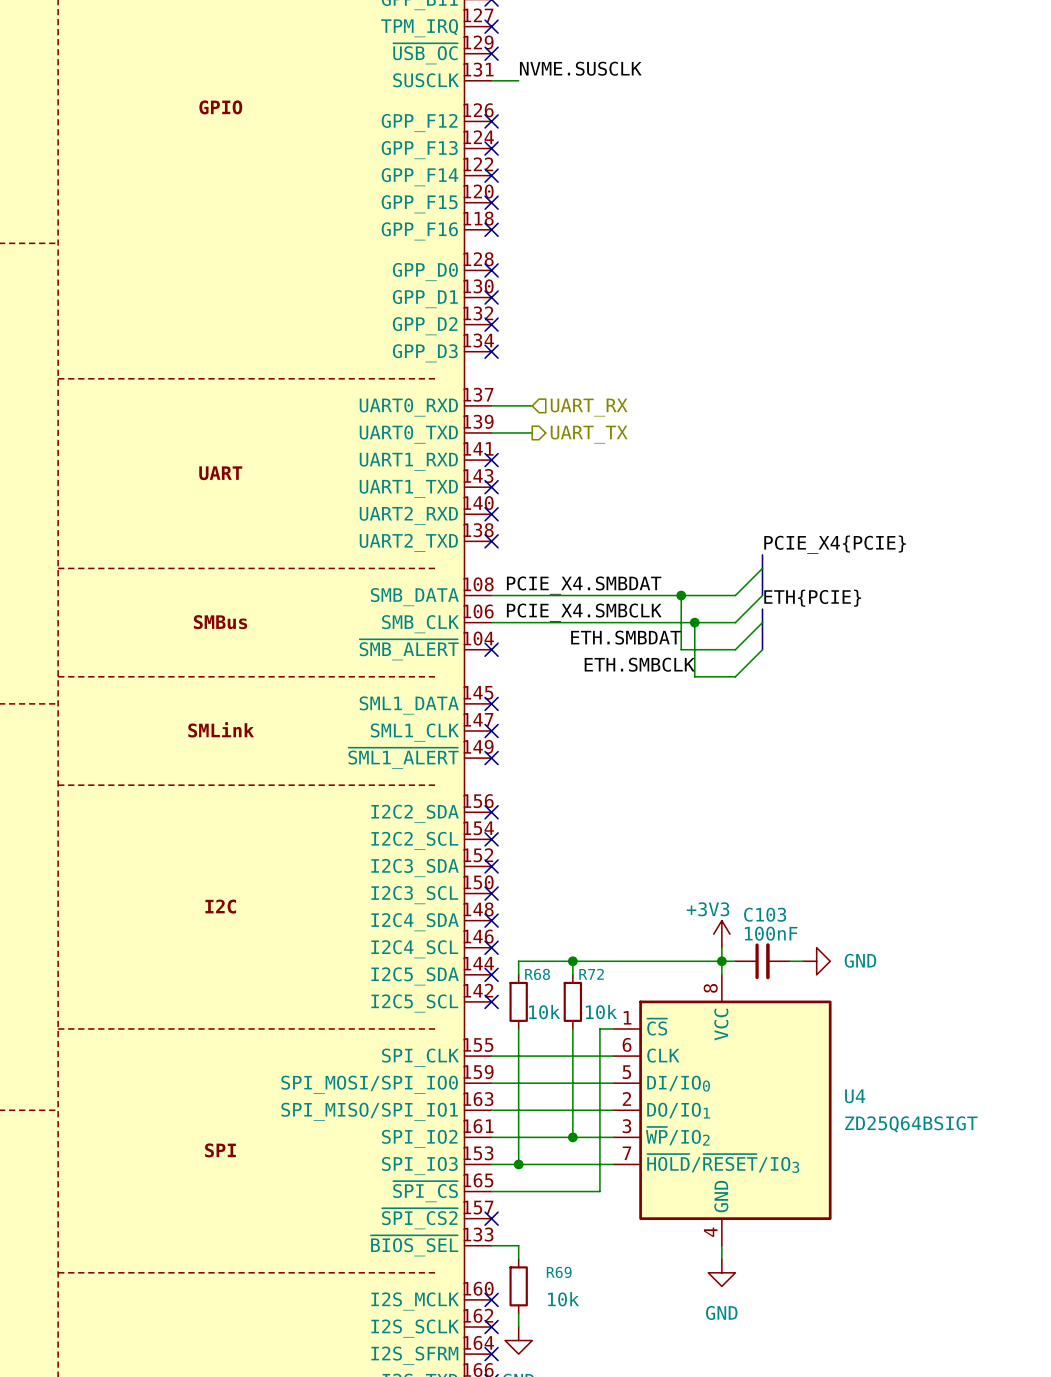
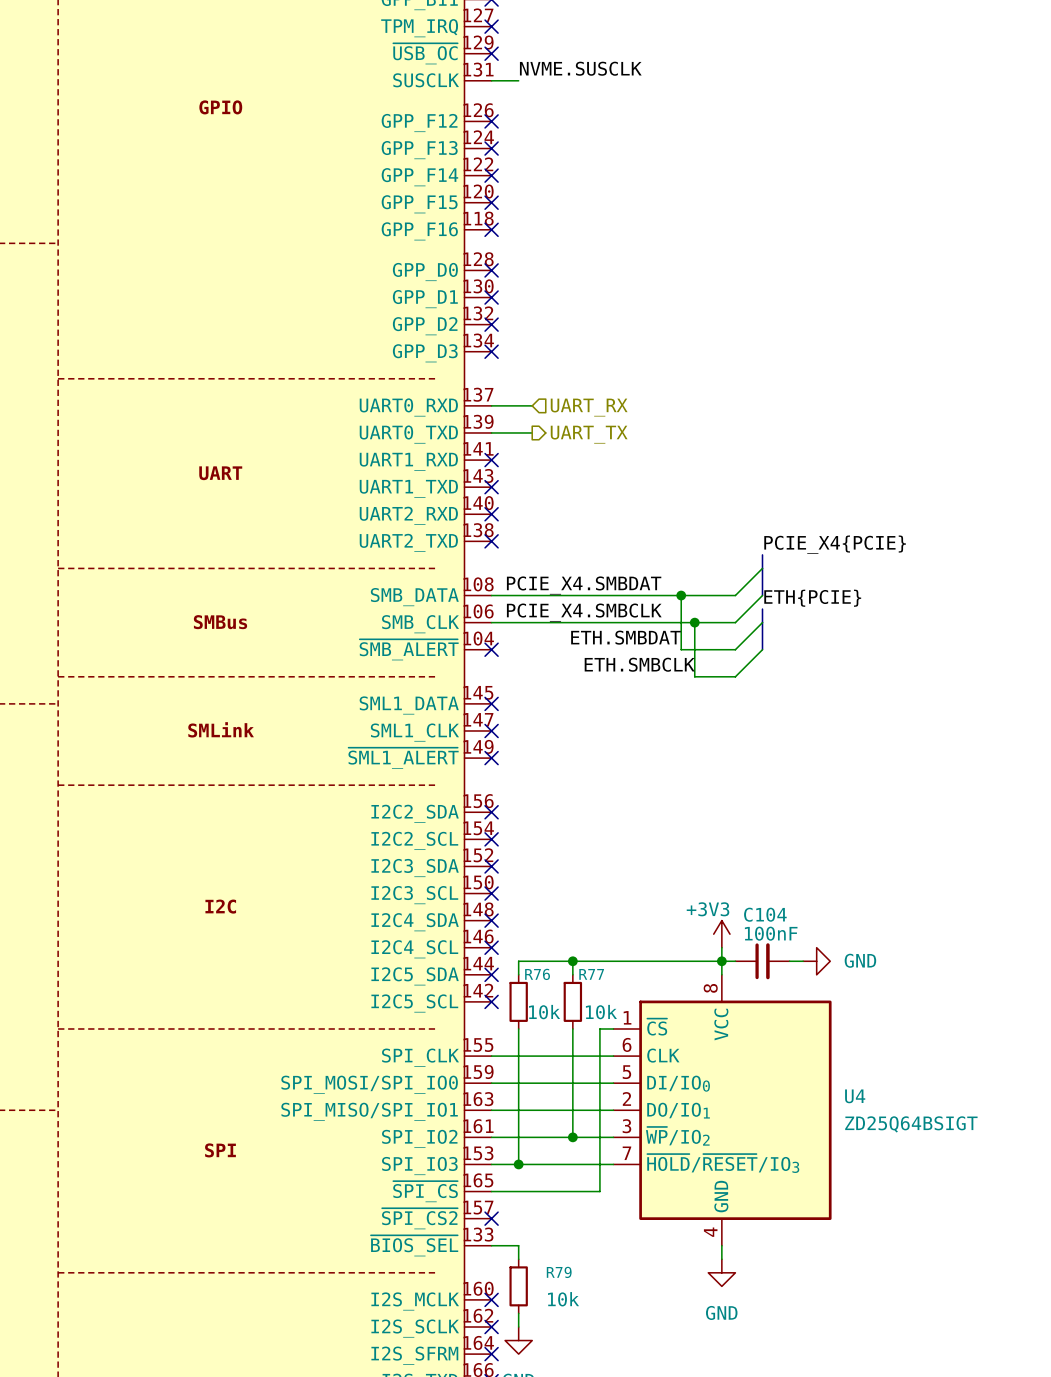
C103 name: C103 (765, 914) -> C104 (765, 914)
R68 name: R68 (537, 974) -> R76 (537, 974)
R72 name: R72 (591, 974) -> R77 (591, 974)
R69 name: R69 (559, 1272) -> R79 (559, 1272)

